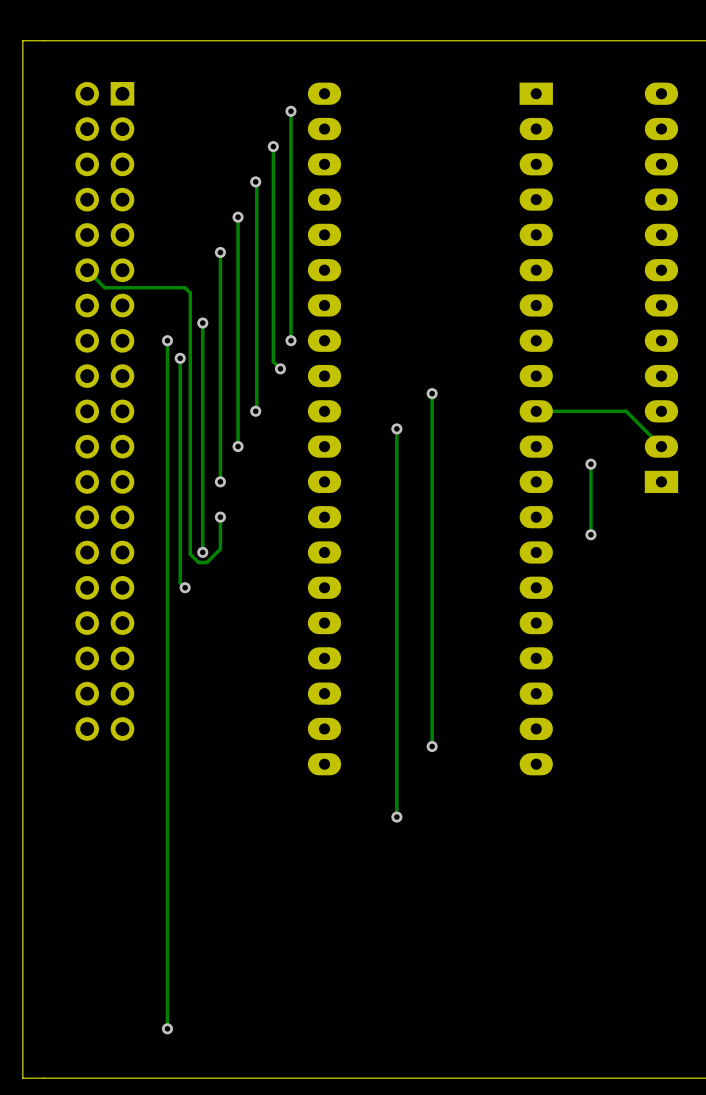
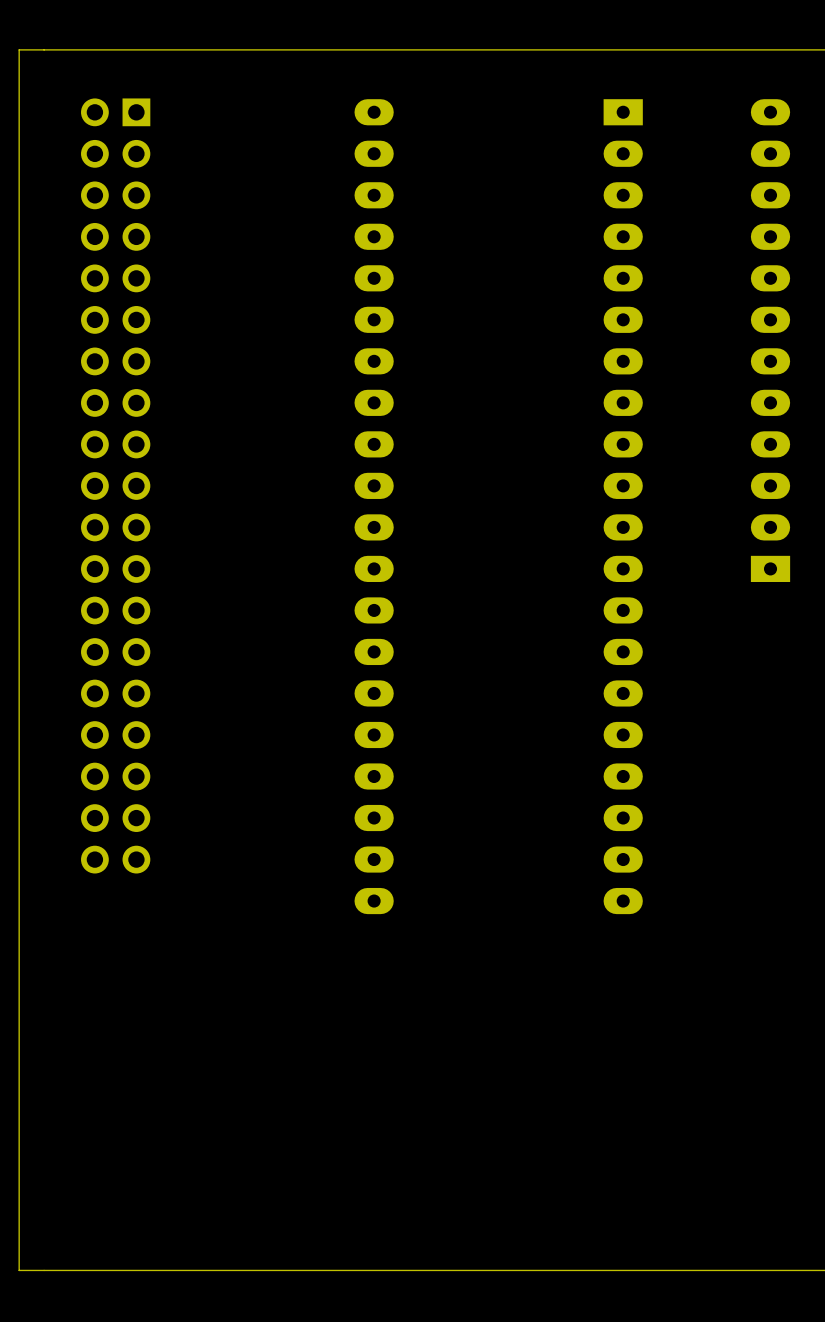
track: (291, 111) (291, 340) -> none
via: (291, 111) -> none
track: (273, 146) (273, 361) (280, 368) -> none
via: (273, 146) -> none
track: (255, 181) (255, 411) -> none
via: (255, 181) -> none
track: (238, 217) (238, 446) -> none
via: (238, 217) -> none
track: (220, 252) (220, 481) -> none
via: (220, 252) -> none
track: (87, 270) (104, 287) (185, 287) (190, 292) (190, 554) (198, 562) (206, 562) (220, 549) (220, 517) -> none
track: (202, 323) (202, 552) -> none
via: (202, 323) -> none
track: (167, 340) (167, 1028) -> none
via: (167, 340) -> none
via: (291, 340) -> none
track: (180, 358) (180, 582) (185, 587) -> none
via: (180, 358) -> none
via: (280, 368) -> none
track: (432, 393) (432, 746) -> none
via: (432, 393) -> none
via: (255, 411) -> none
track: (536, 411) (626, 411) (661, 446) -> none
track: (396, 428) (396, 817) -> none
via: (396, 428) -> none
via: (238, 446) -> none
track: (590, 464) (590, 534) -> none
via: (590, 464) -> none
via: (220, 481) -> none
via: (220, 517) -> none
via: (590, 534) -> none
via: (202, 552) -> none
via: (185, 587) -> none
via: (432, 746) -> none
via: (396, 817) -> none
via: (167, 1028) -> none

